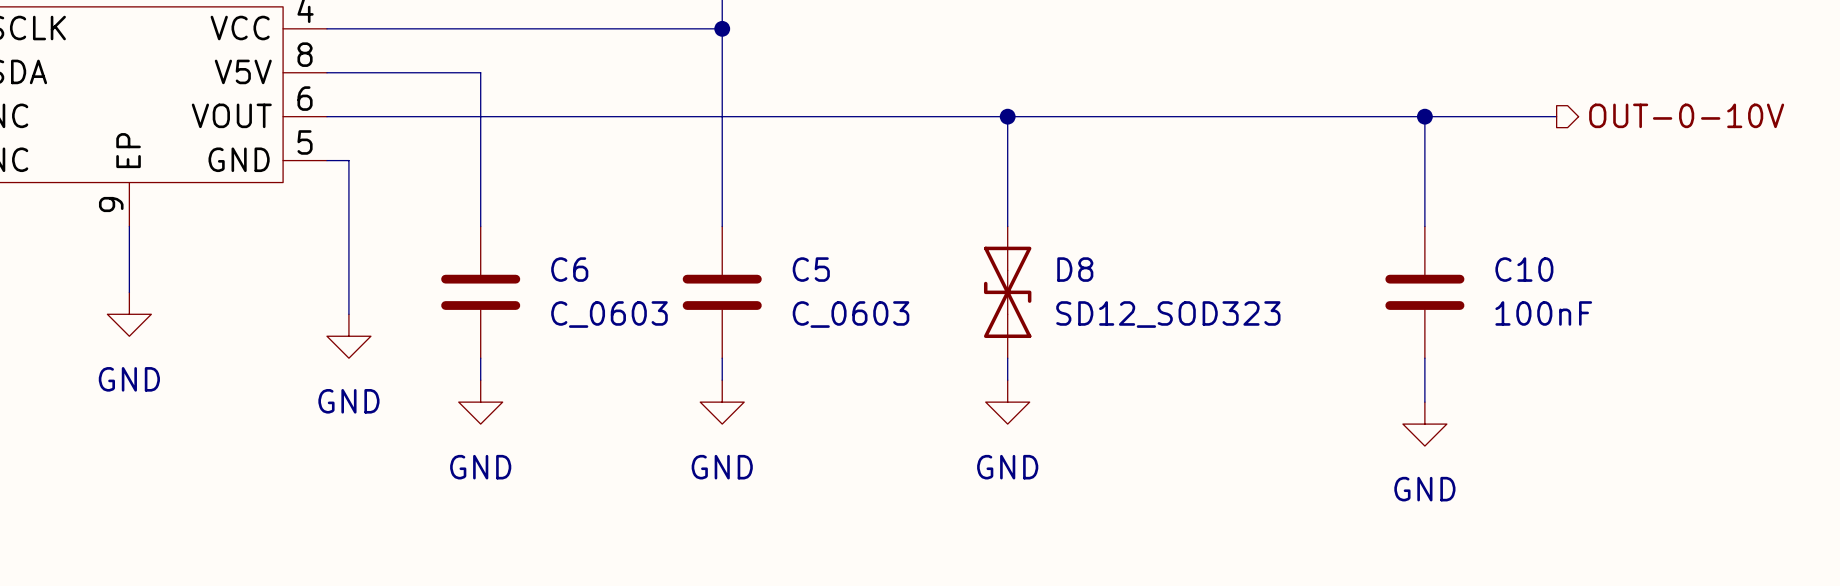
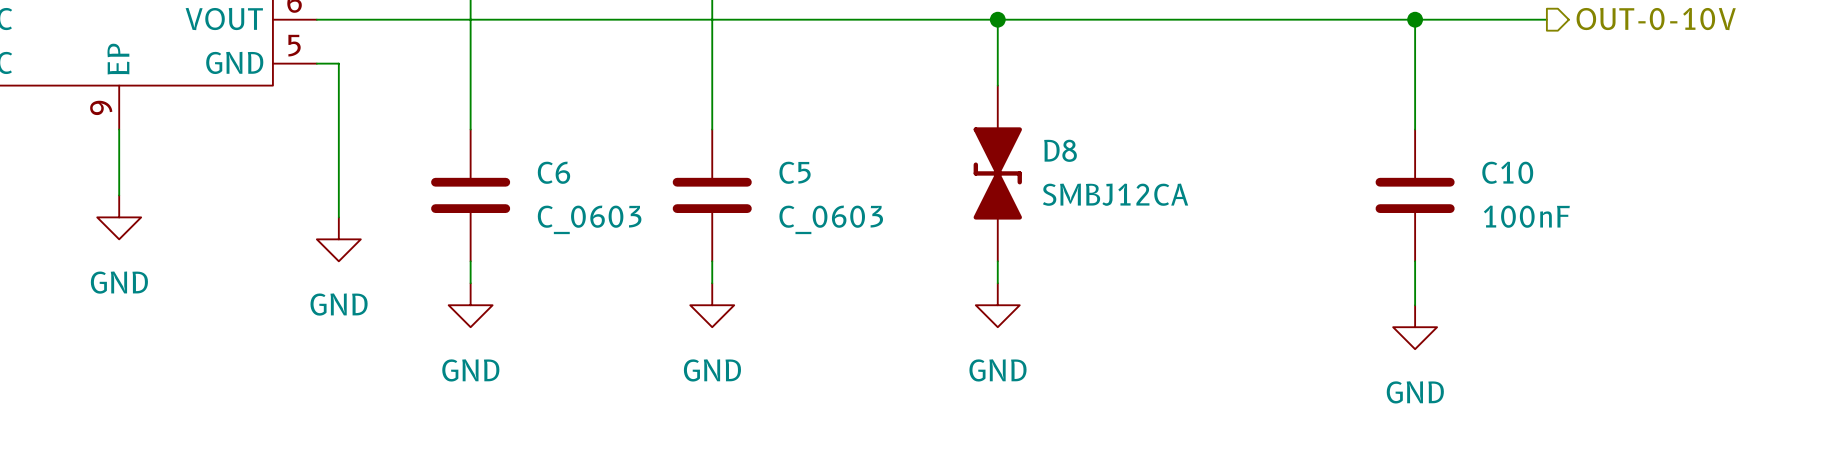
D8 symbol: [983, 226, 1032, 359] -> [973, 85, 1022, 262]
D8 value: SD12_SOD323 (1168, 314) -> SMBJ12CA (1115, 194)

